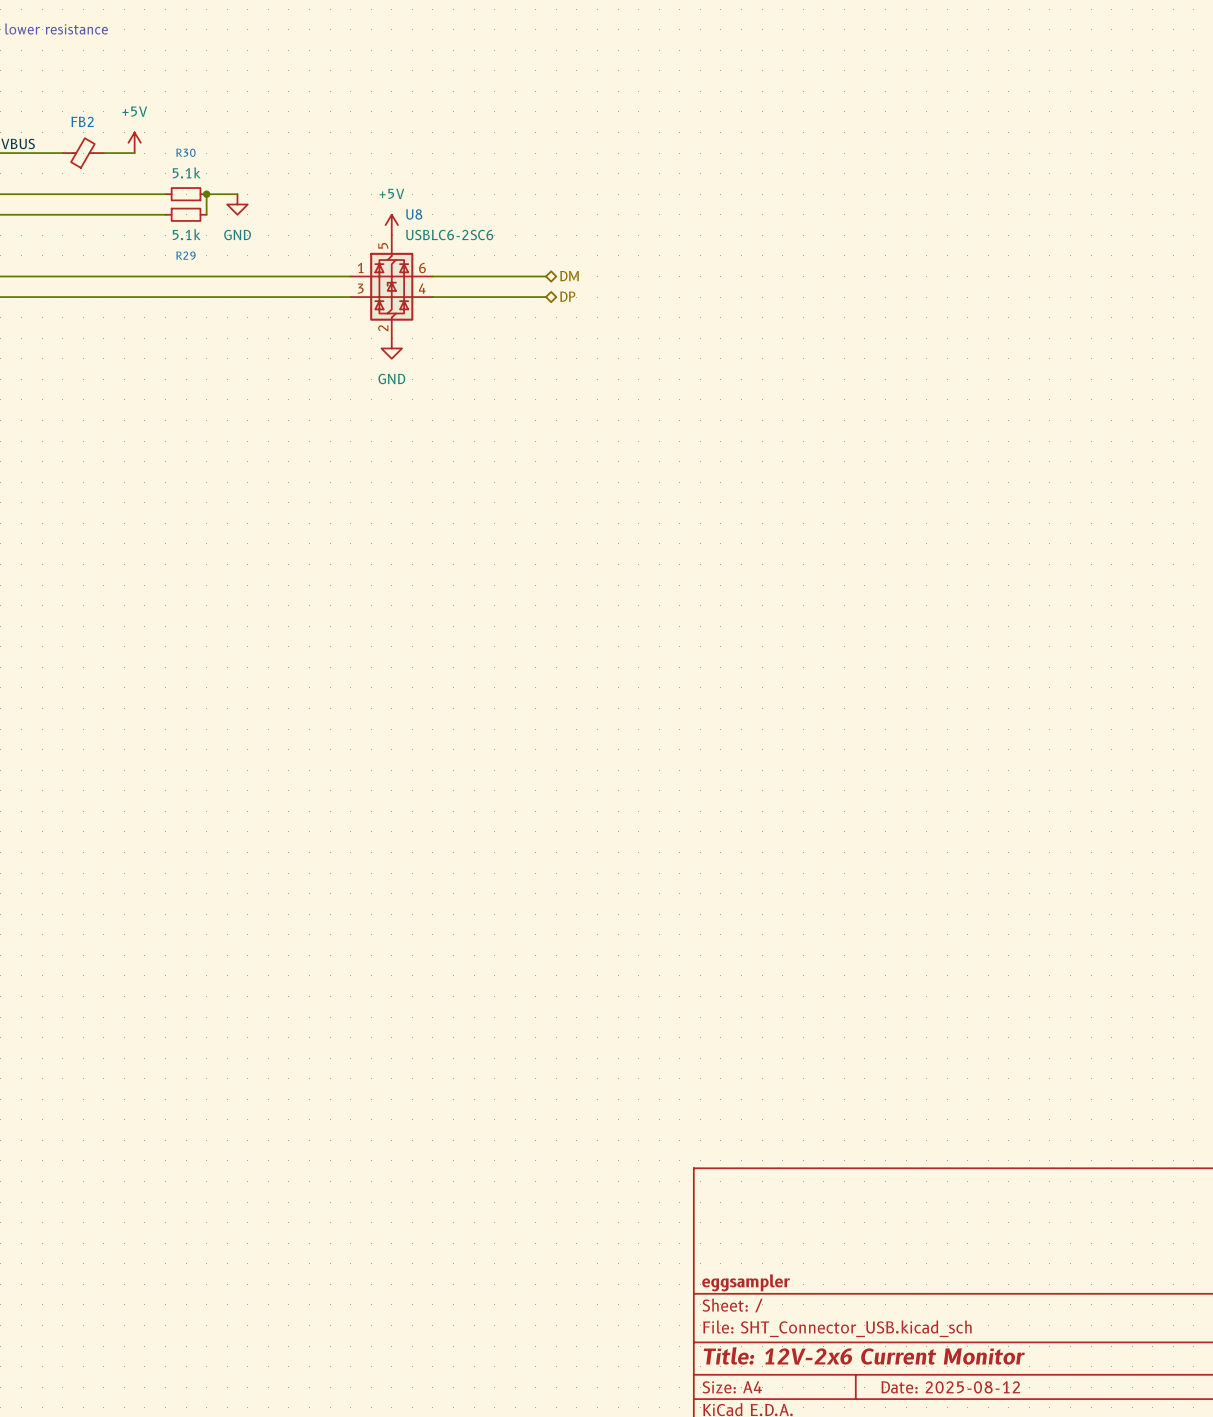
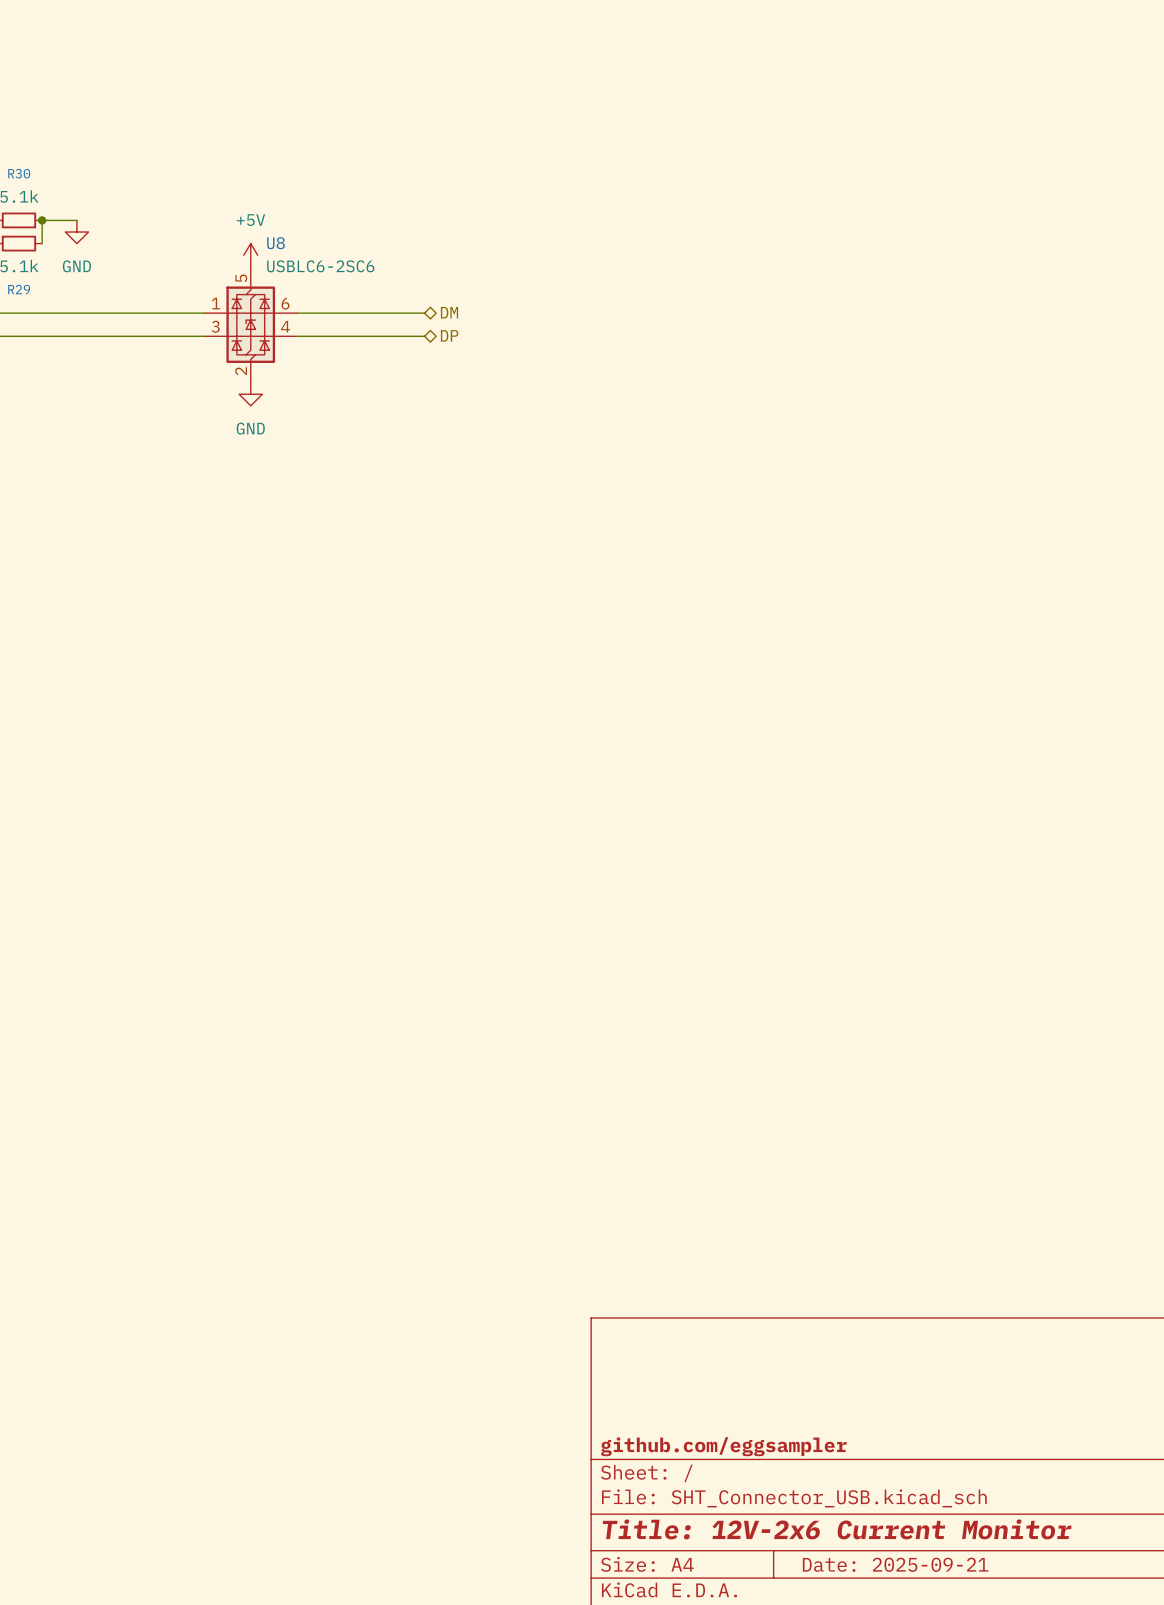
title block: eggsampler (746, 1282) -> github.com/eggsampler (723, 1446)
title block: Date: 2025-08-12 (950, 1387) -> Date: 2025-09-21 (895, 1564)

